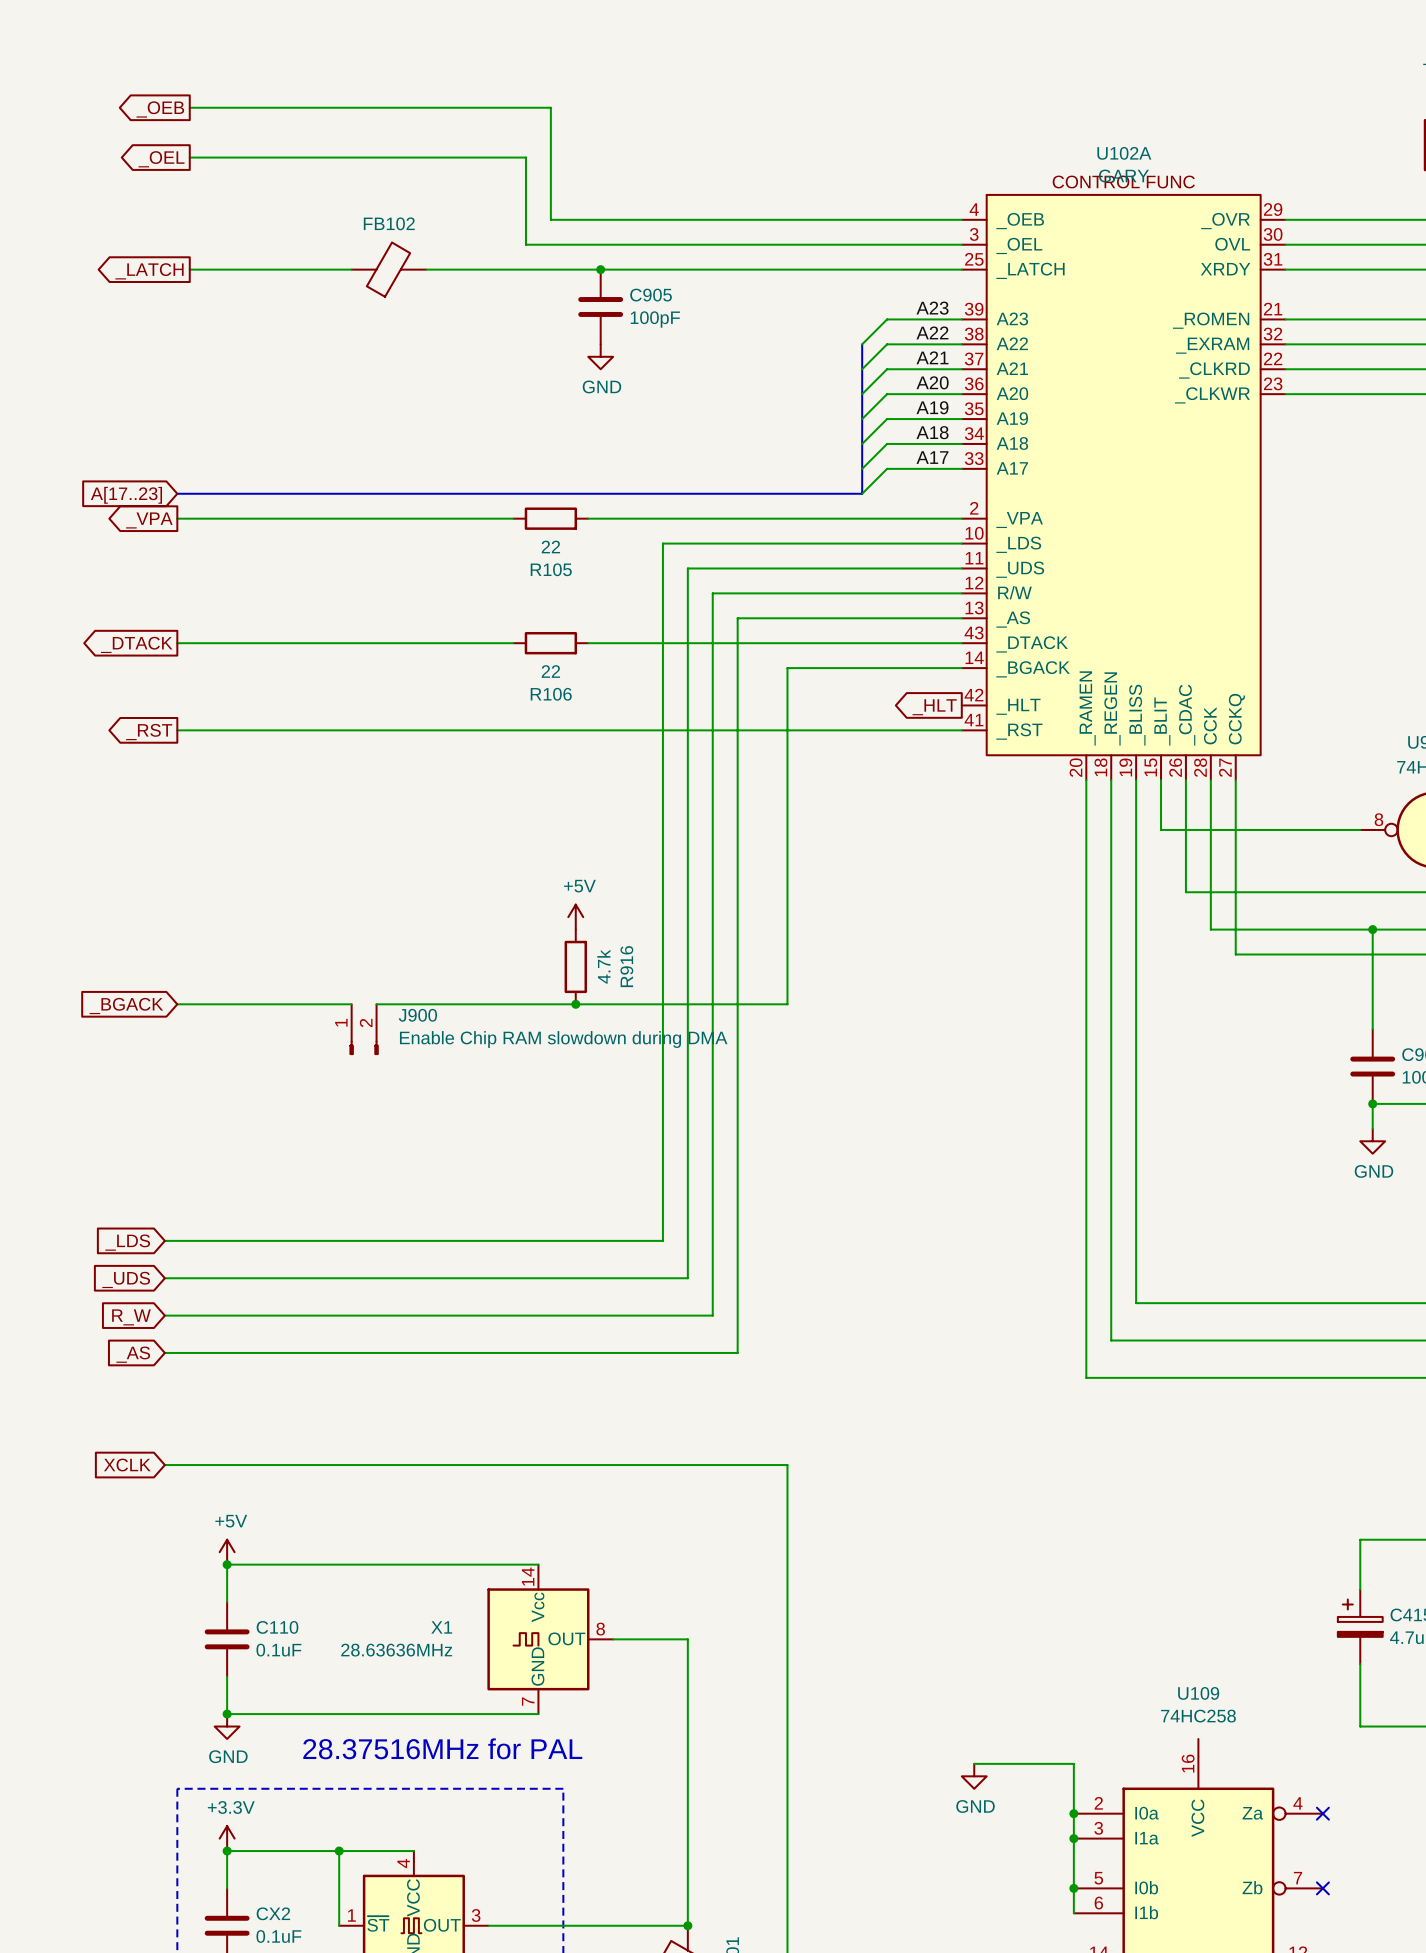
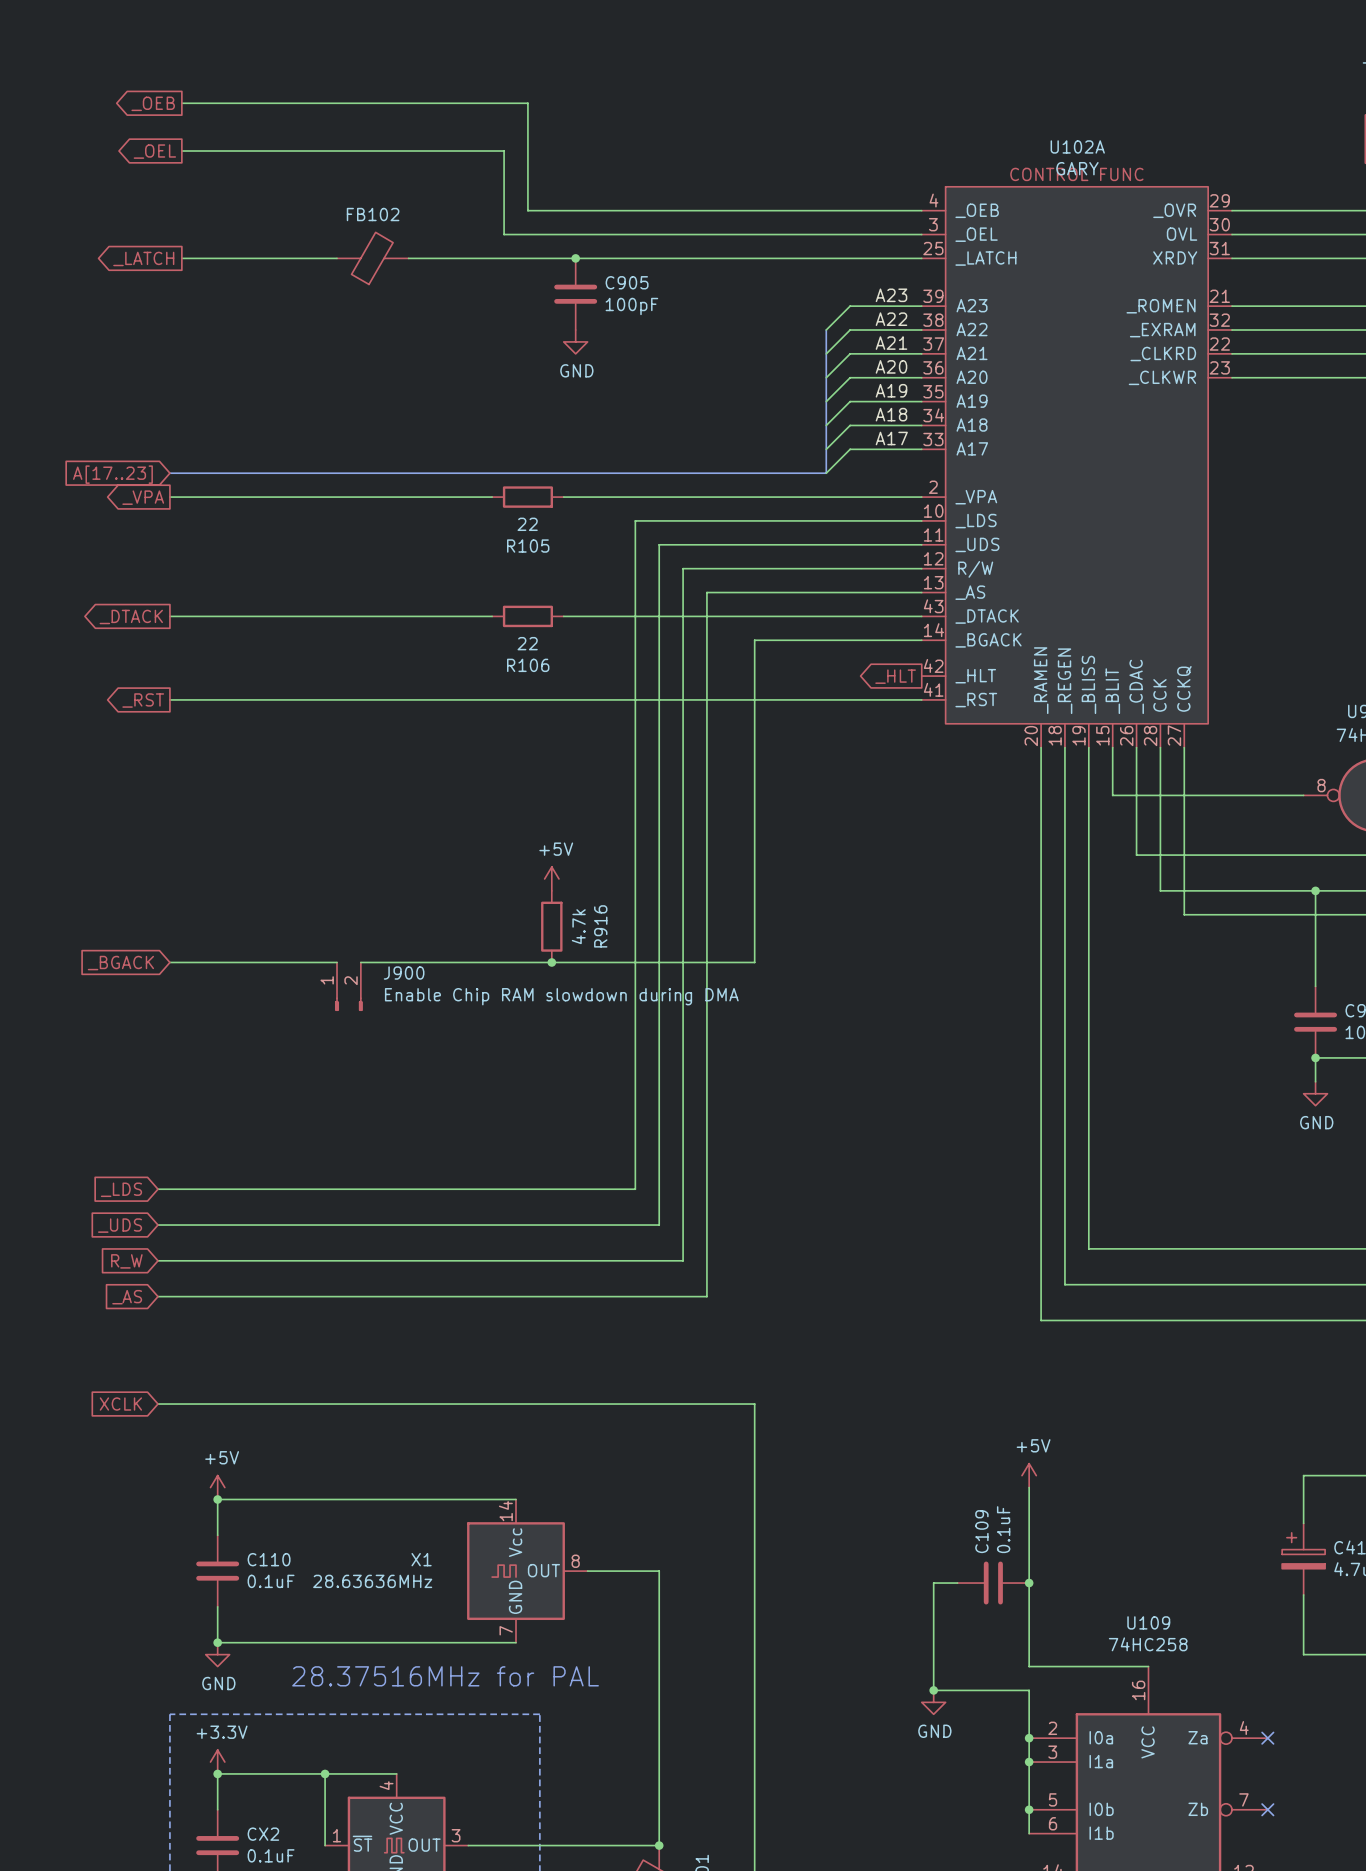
power symbol: none -> +5V (1029, 1475)
wire: none -> (1029, 1487) (1029, 1666) (1148, 1666)
wire: none -> (957, 1583) (933, 1583) (933, 1690)
C109: none -> 0.1uF (993, 1583)
junction: none -> (1029, 1583)
junction: none -> (933, 1690)

